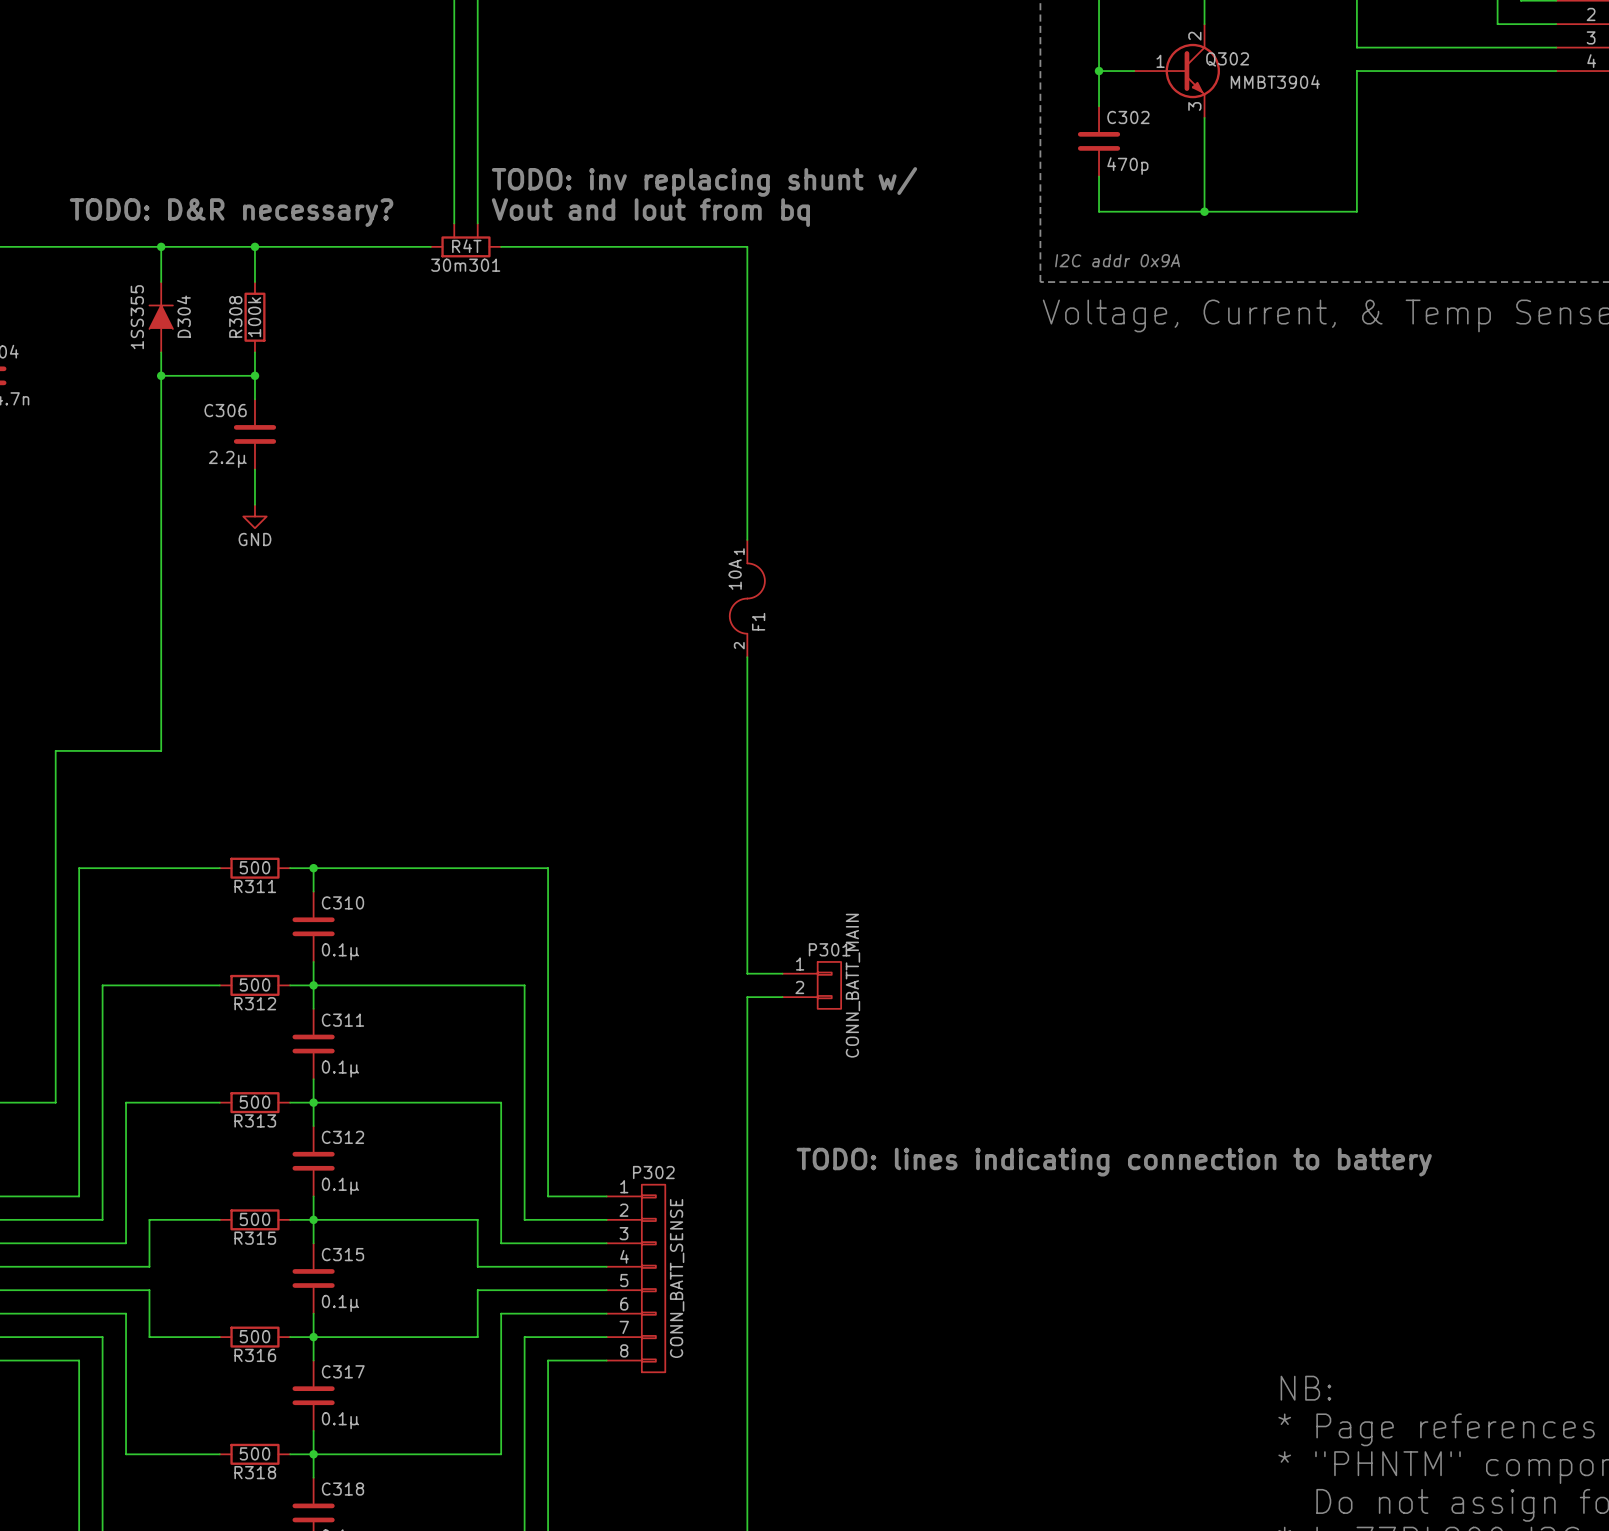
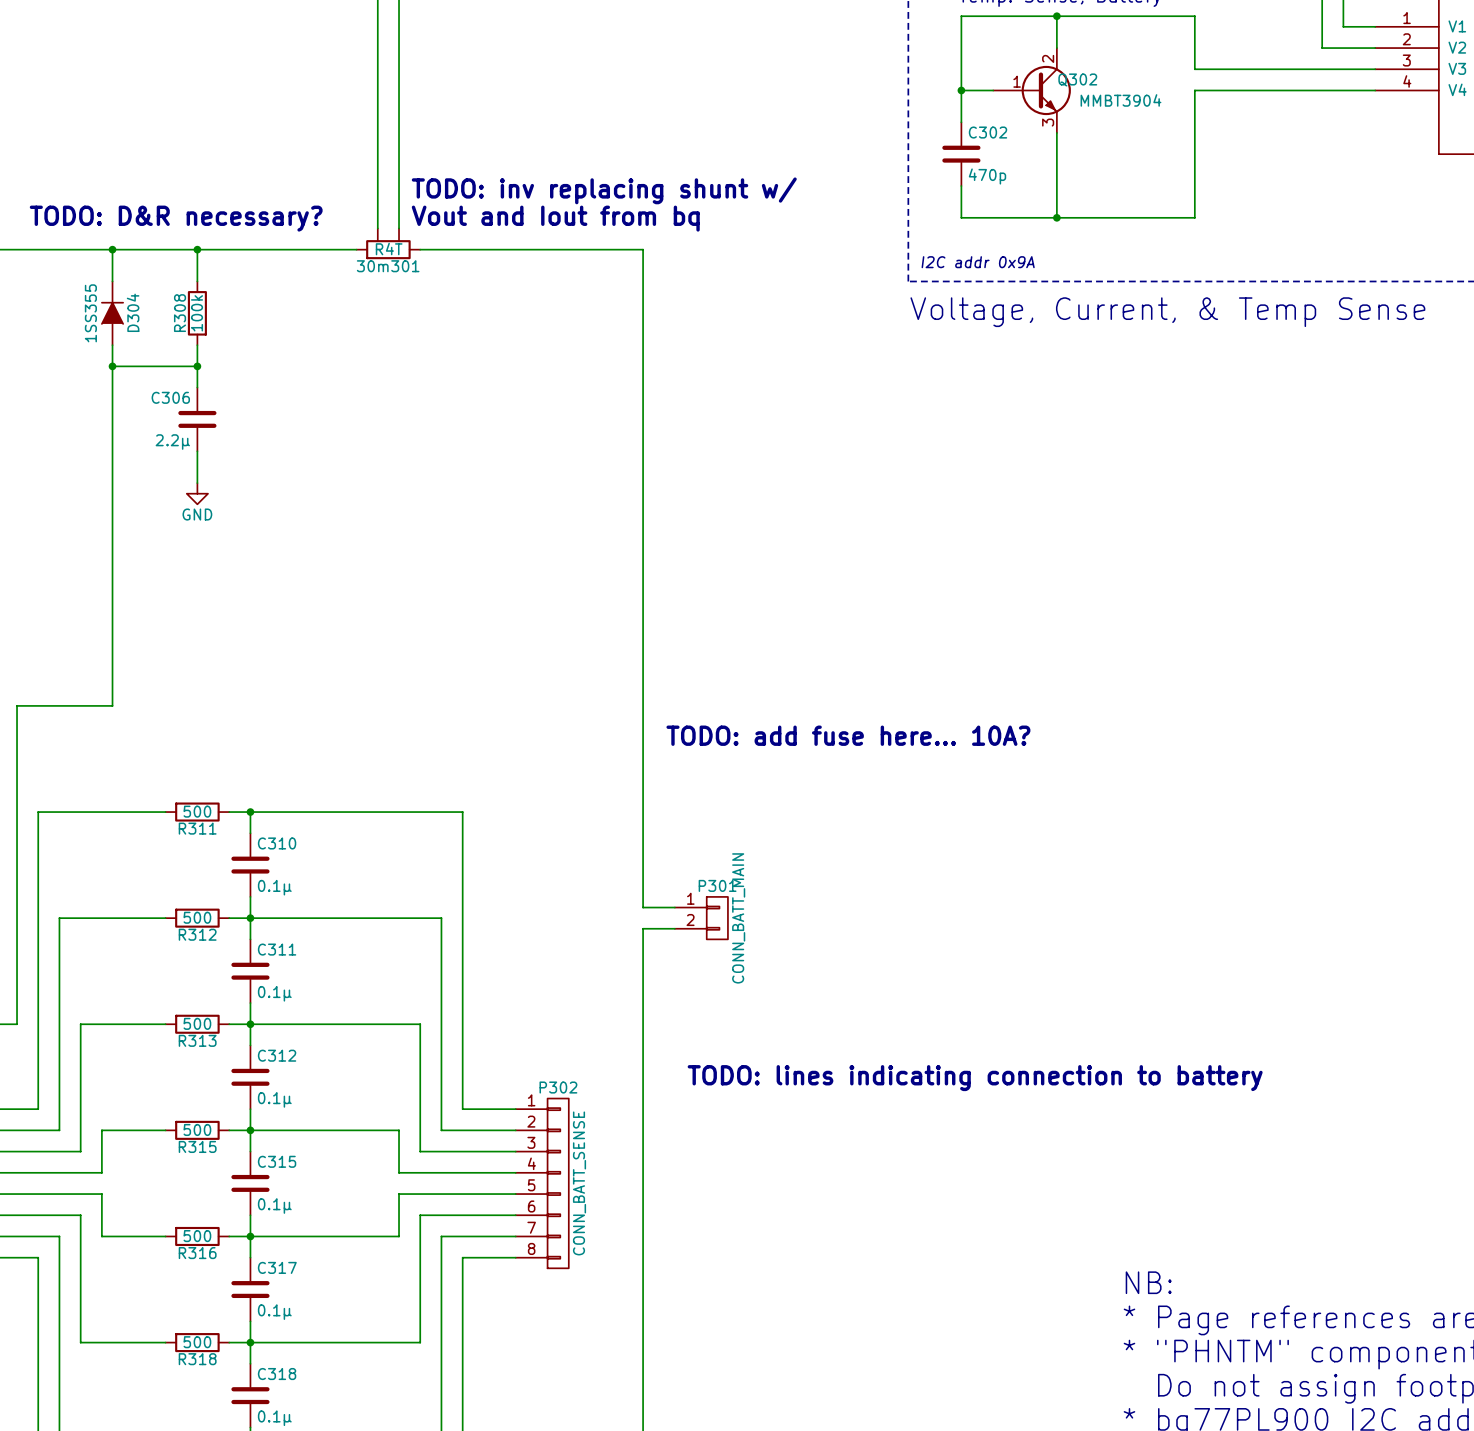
wire: none -> (643, 514) (643, 621)
F1: 10A (747, 598) -> none
text: none -> TODO: add fuse here... 10A? (848, 735)

